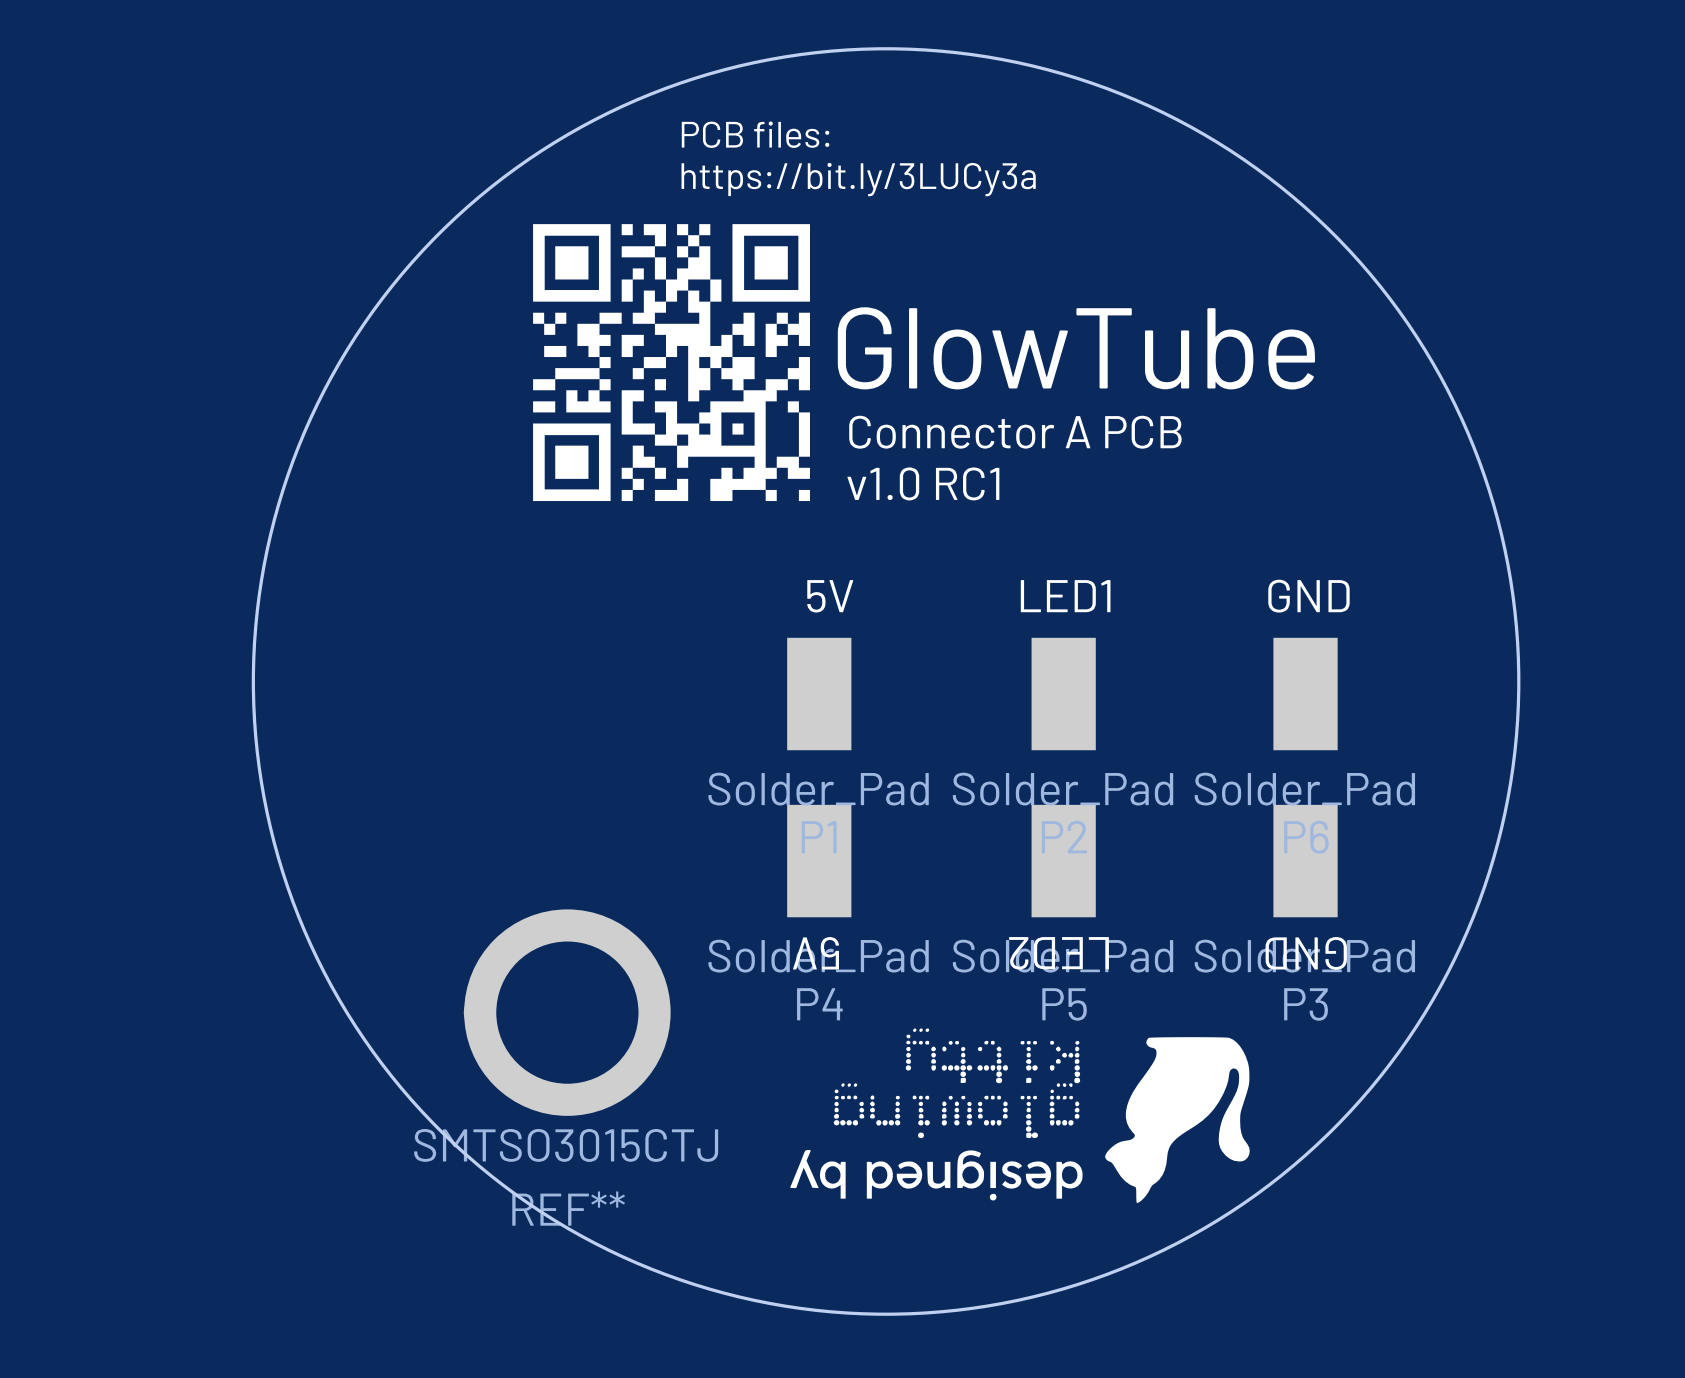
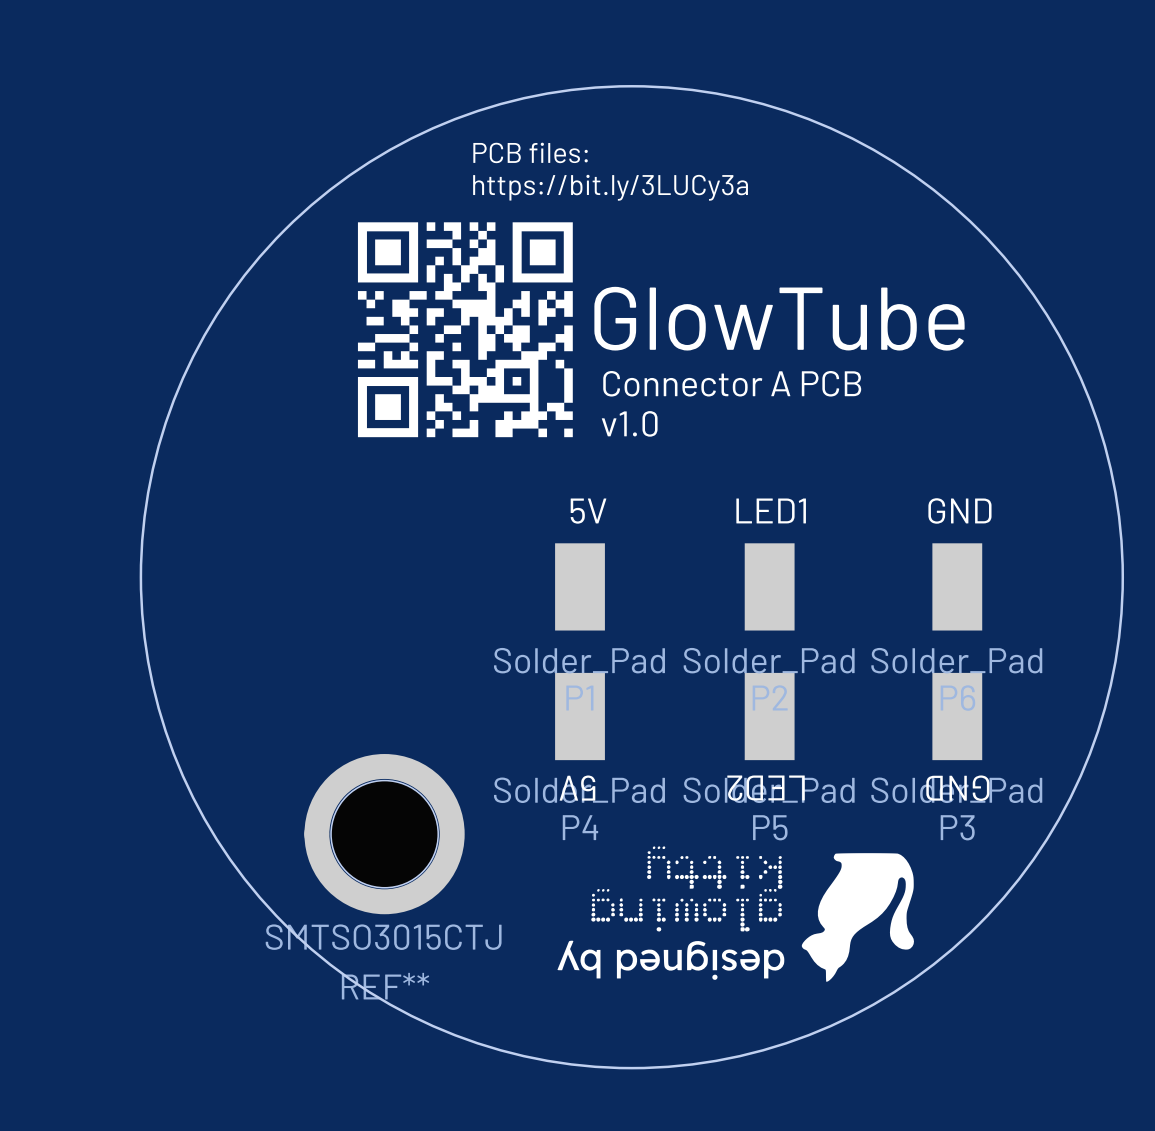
text: v1.0 RC1 (923, 483) -> v1.0 (629, 423)
part footprint: [463, 909, 671, 1116] -> [304, 754, 465, 915]

